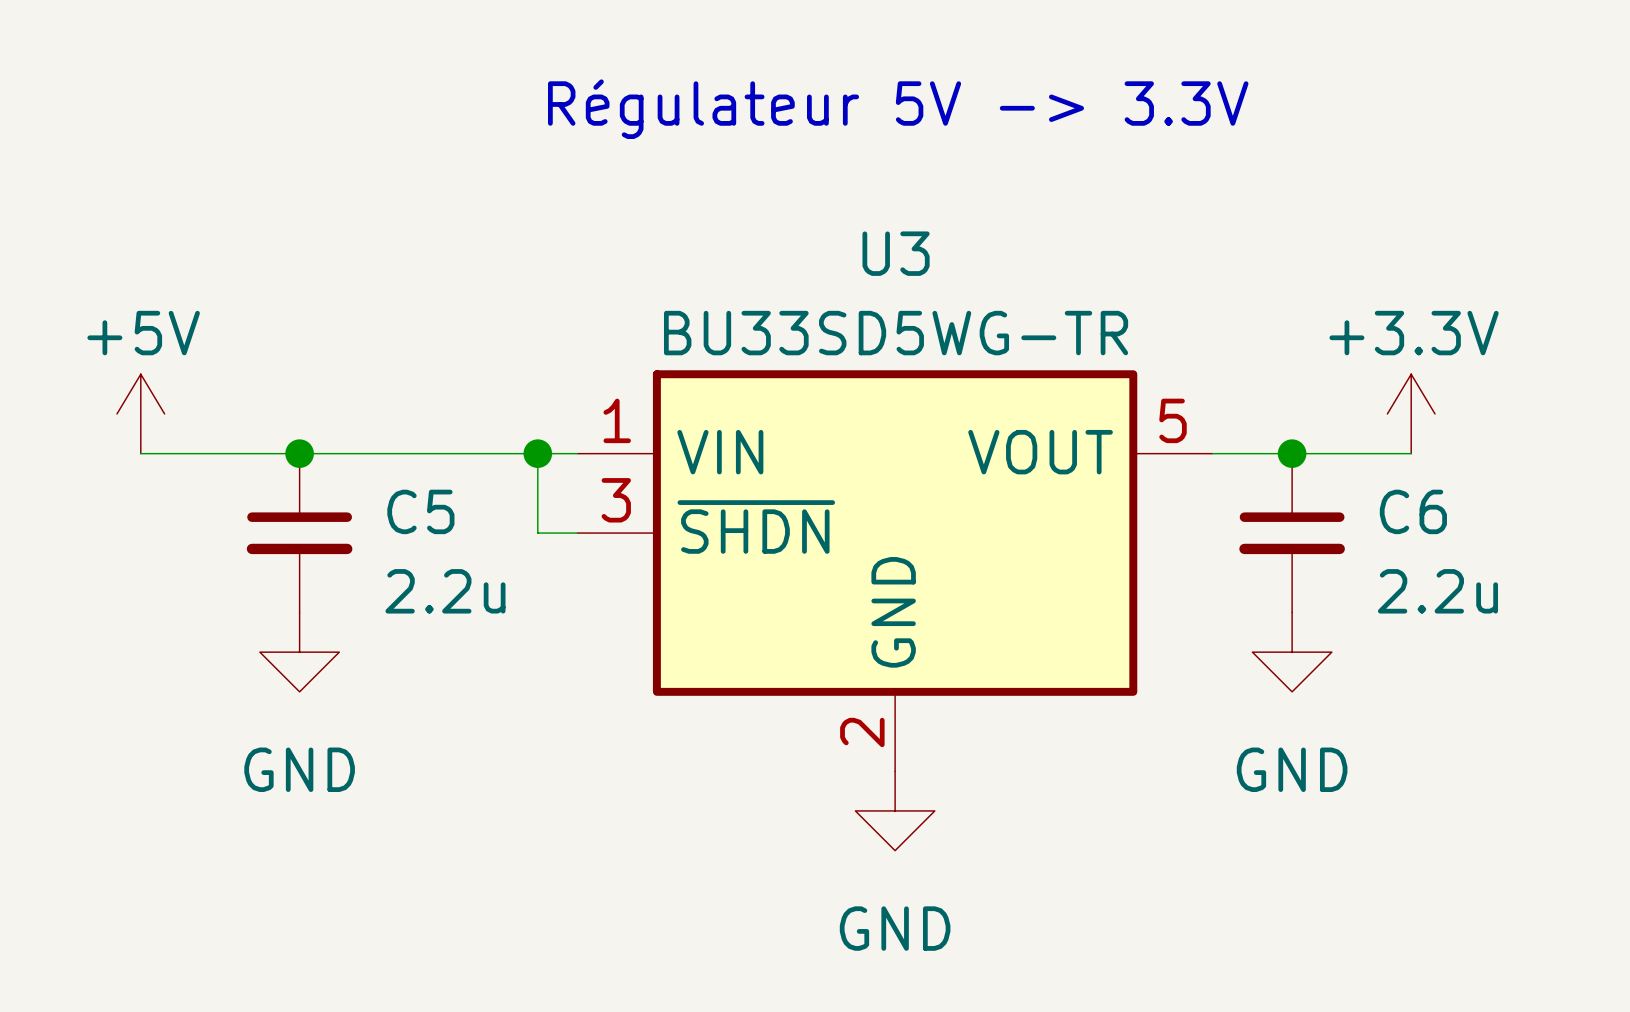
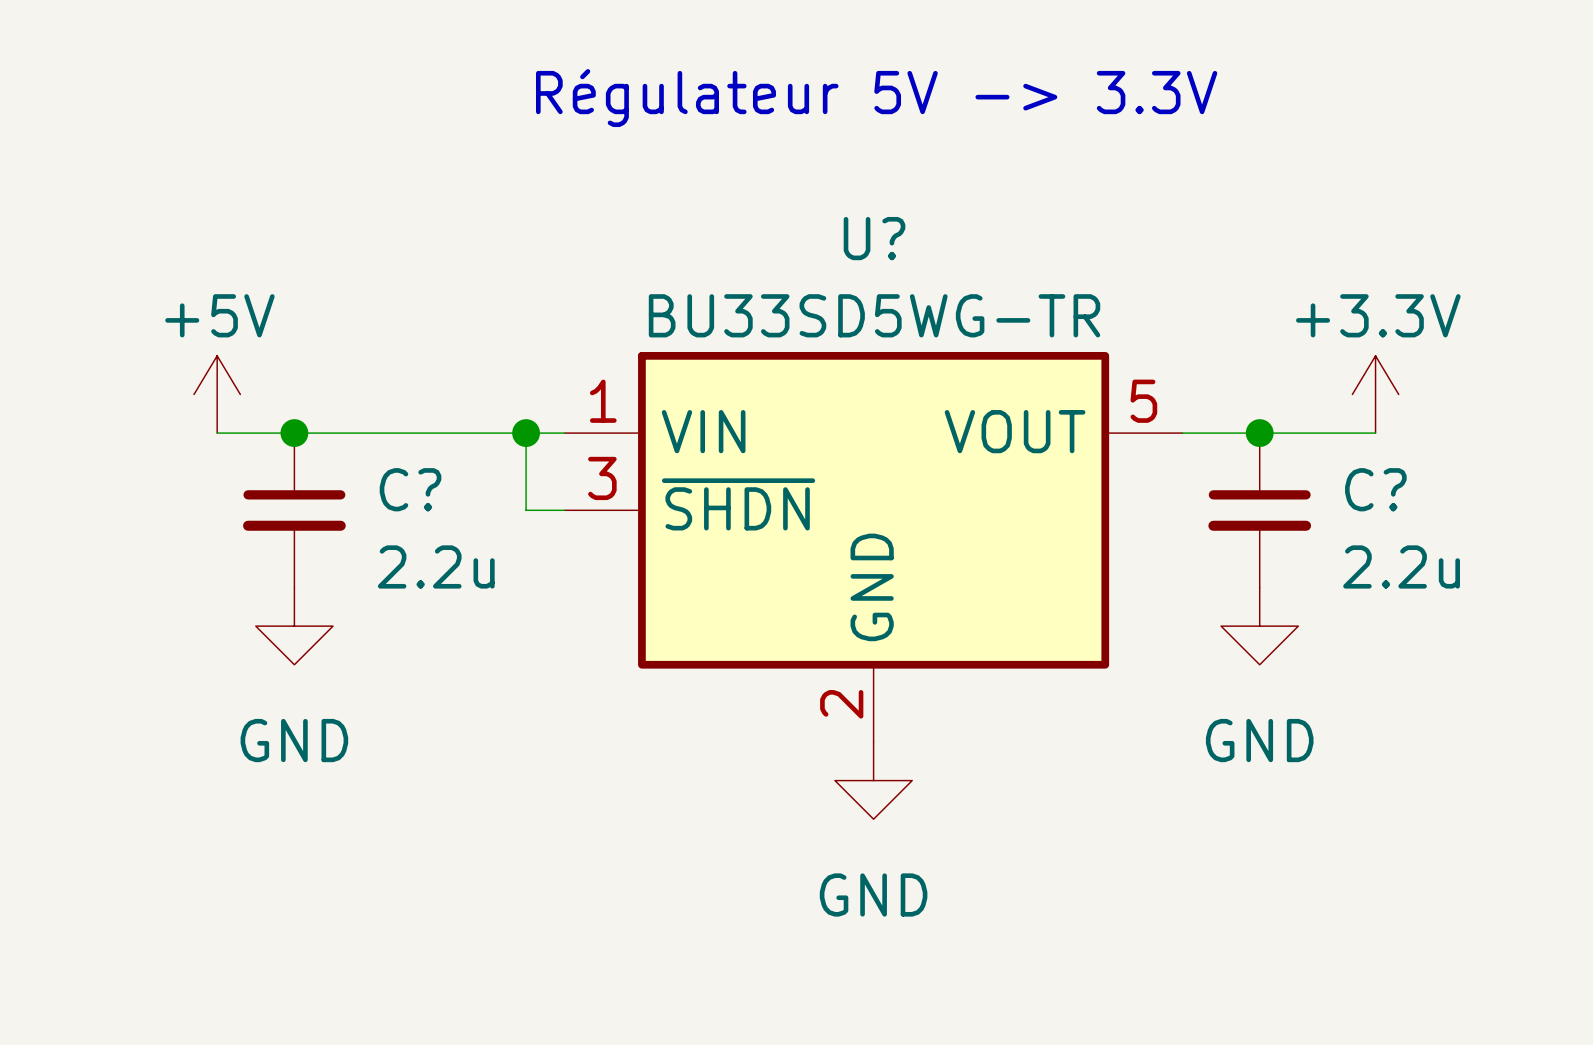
U3 name: U3 (896, 253) -> U? (874, 238)
power symbol position: +5V (140, 413) -> +5V (217, 394)
wire: (140, 453) (220, 453) -> none
C5 name: C5 (420, 511) -> C? (410, 489)
C6 name: C6 (1413, 511) -> C? (1375, 489)

